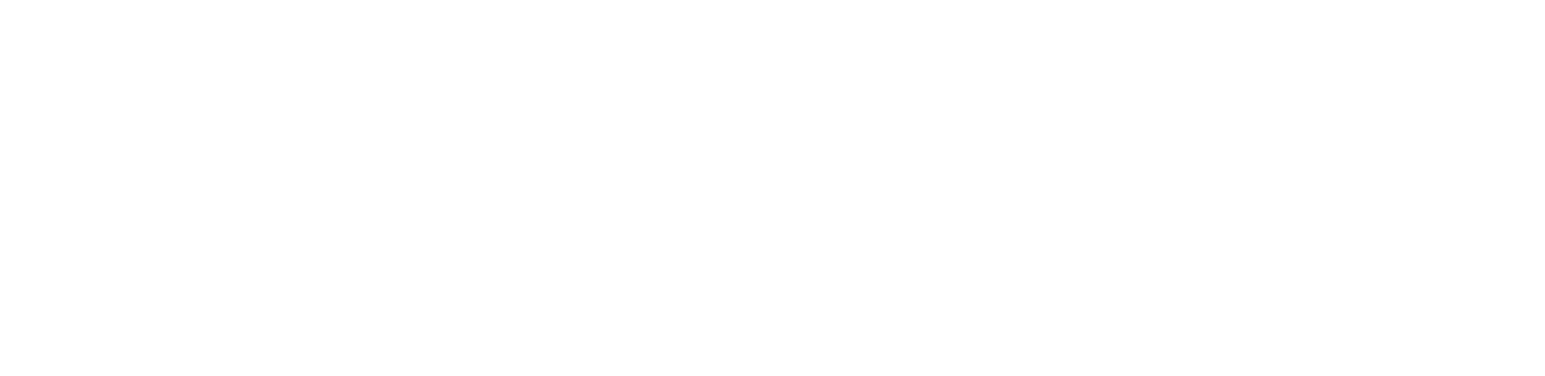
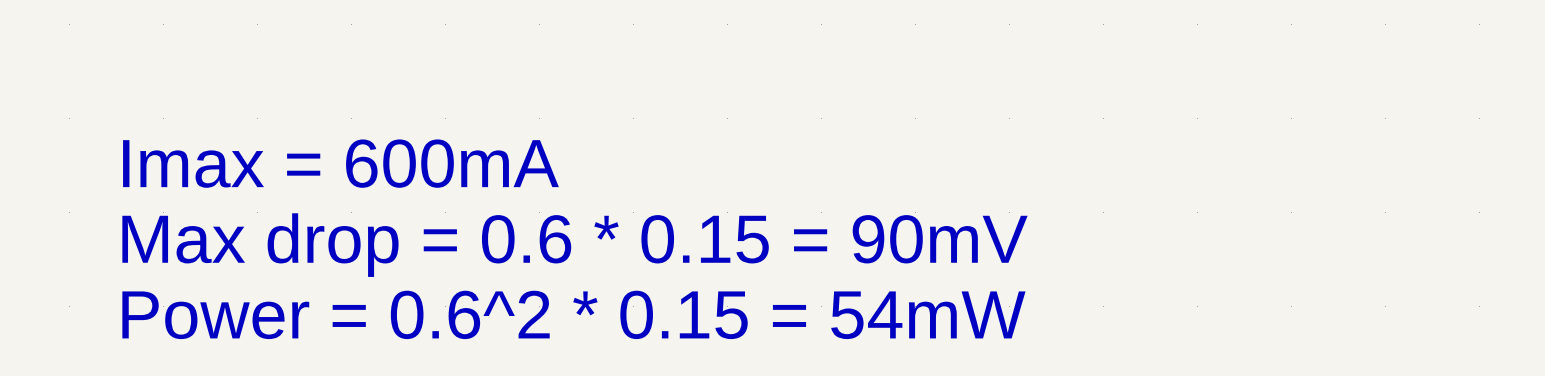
text: none -> Imax = 600mA (340, 163)
text: none -> Max drop = 0.6 * 0.15 = 90mV (574, 245)
text: none -> Power = 0.6^2 * 0.15 = 54mW (573, 314)

